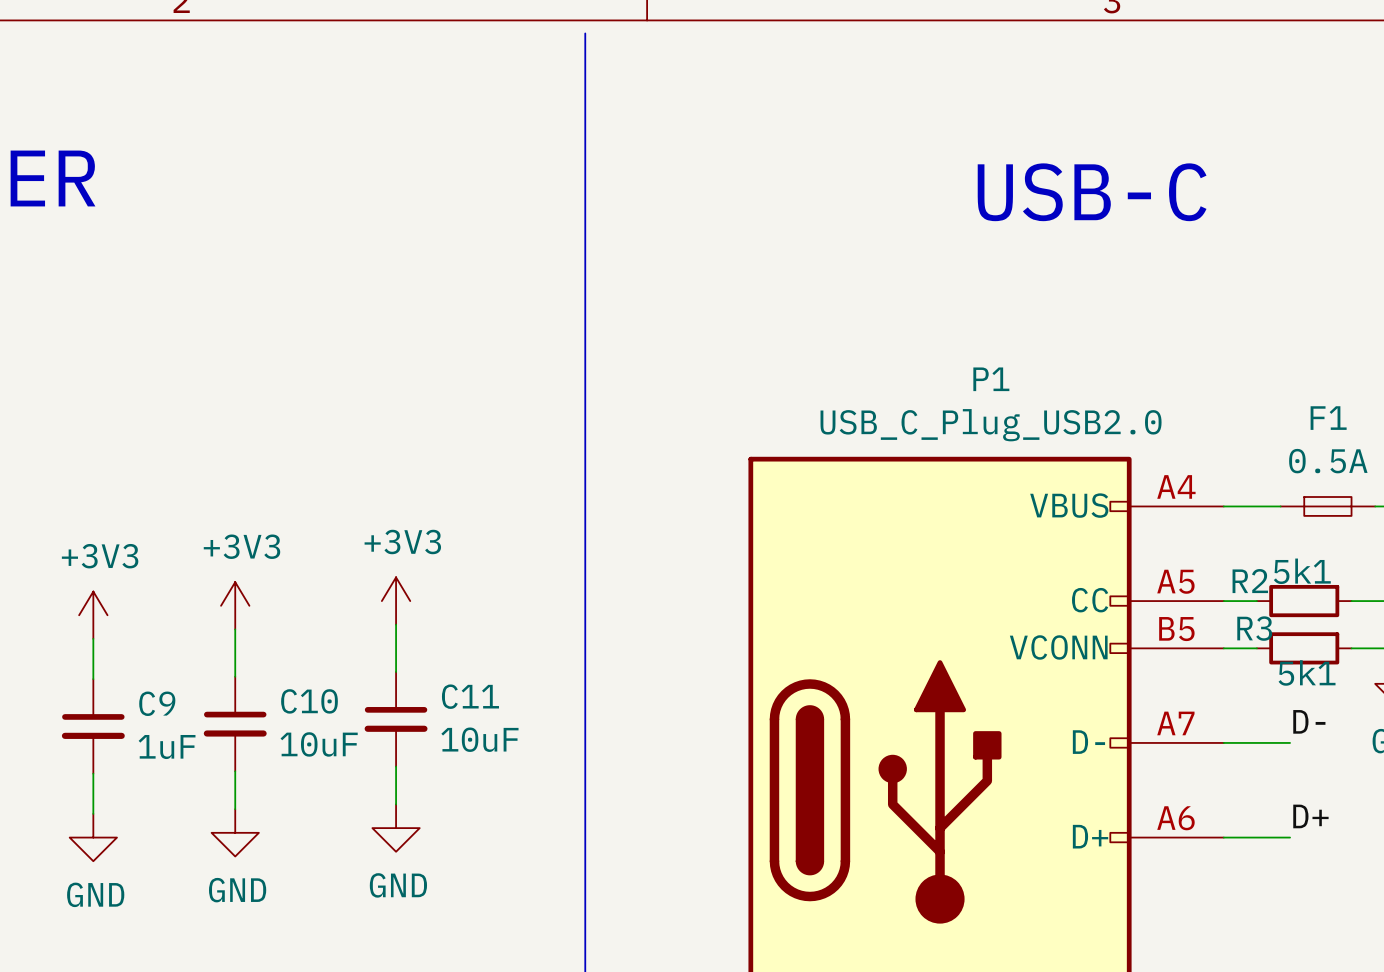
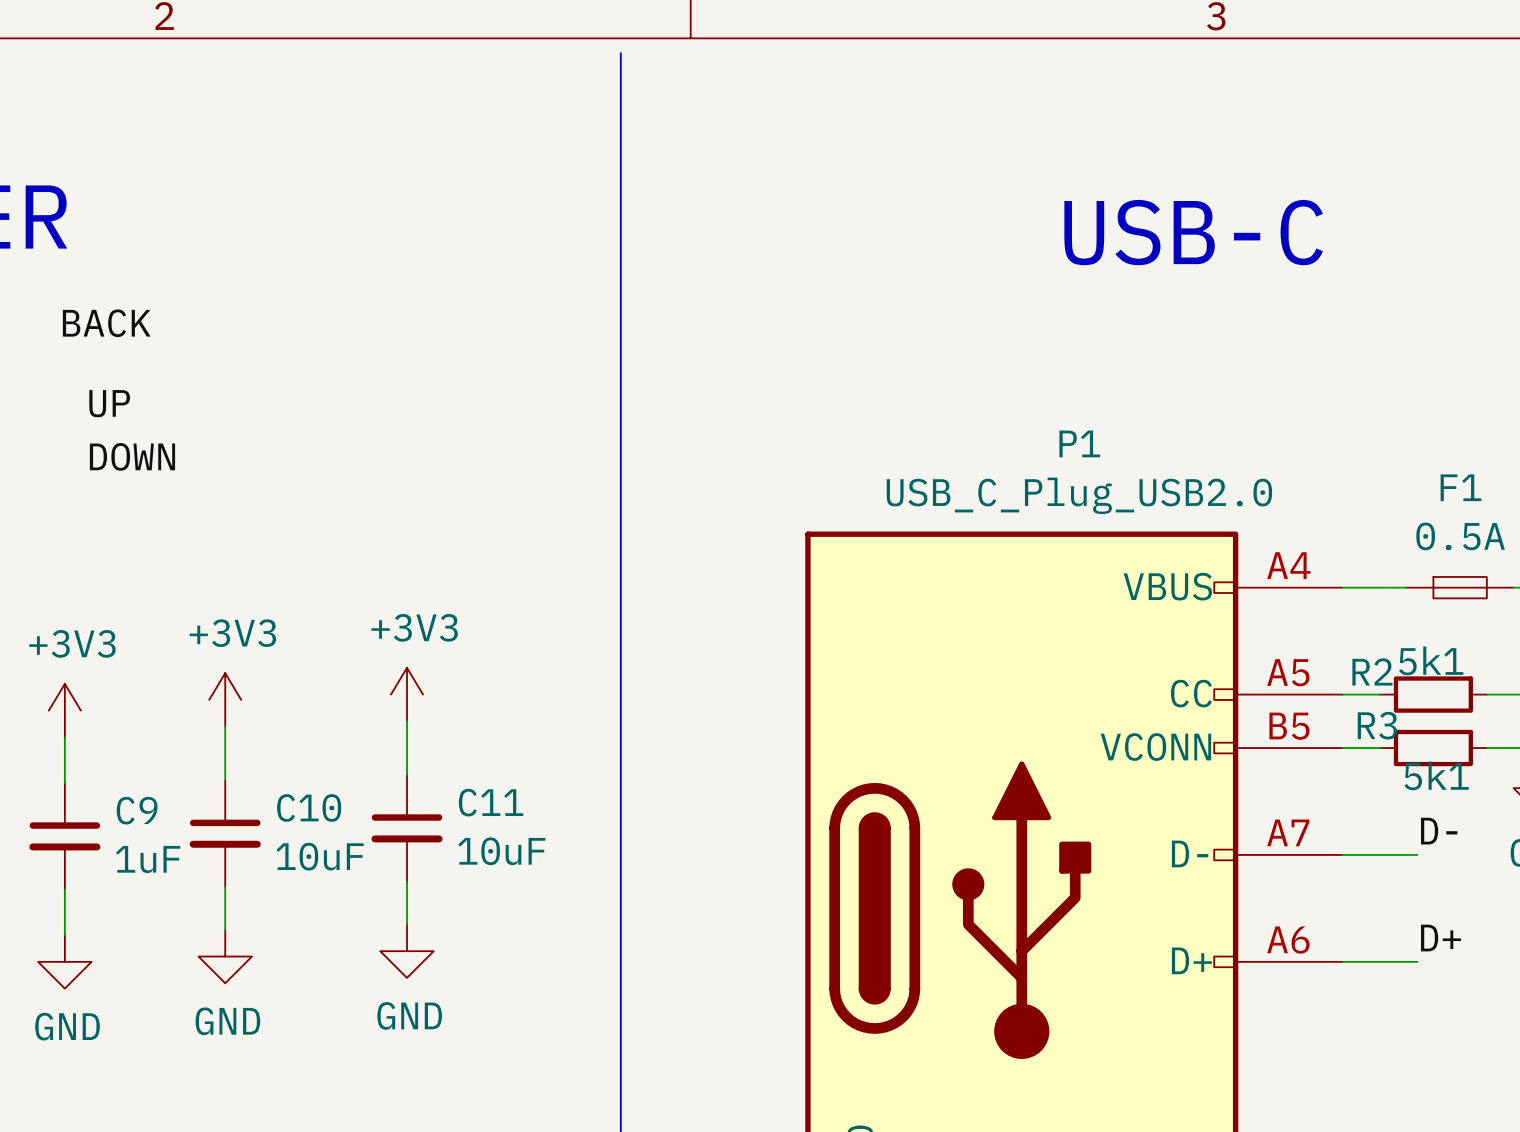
label: none -> BACK (106, 323)
label: none -> UP (109, 403)
label: none -> DOWN (132, 456)

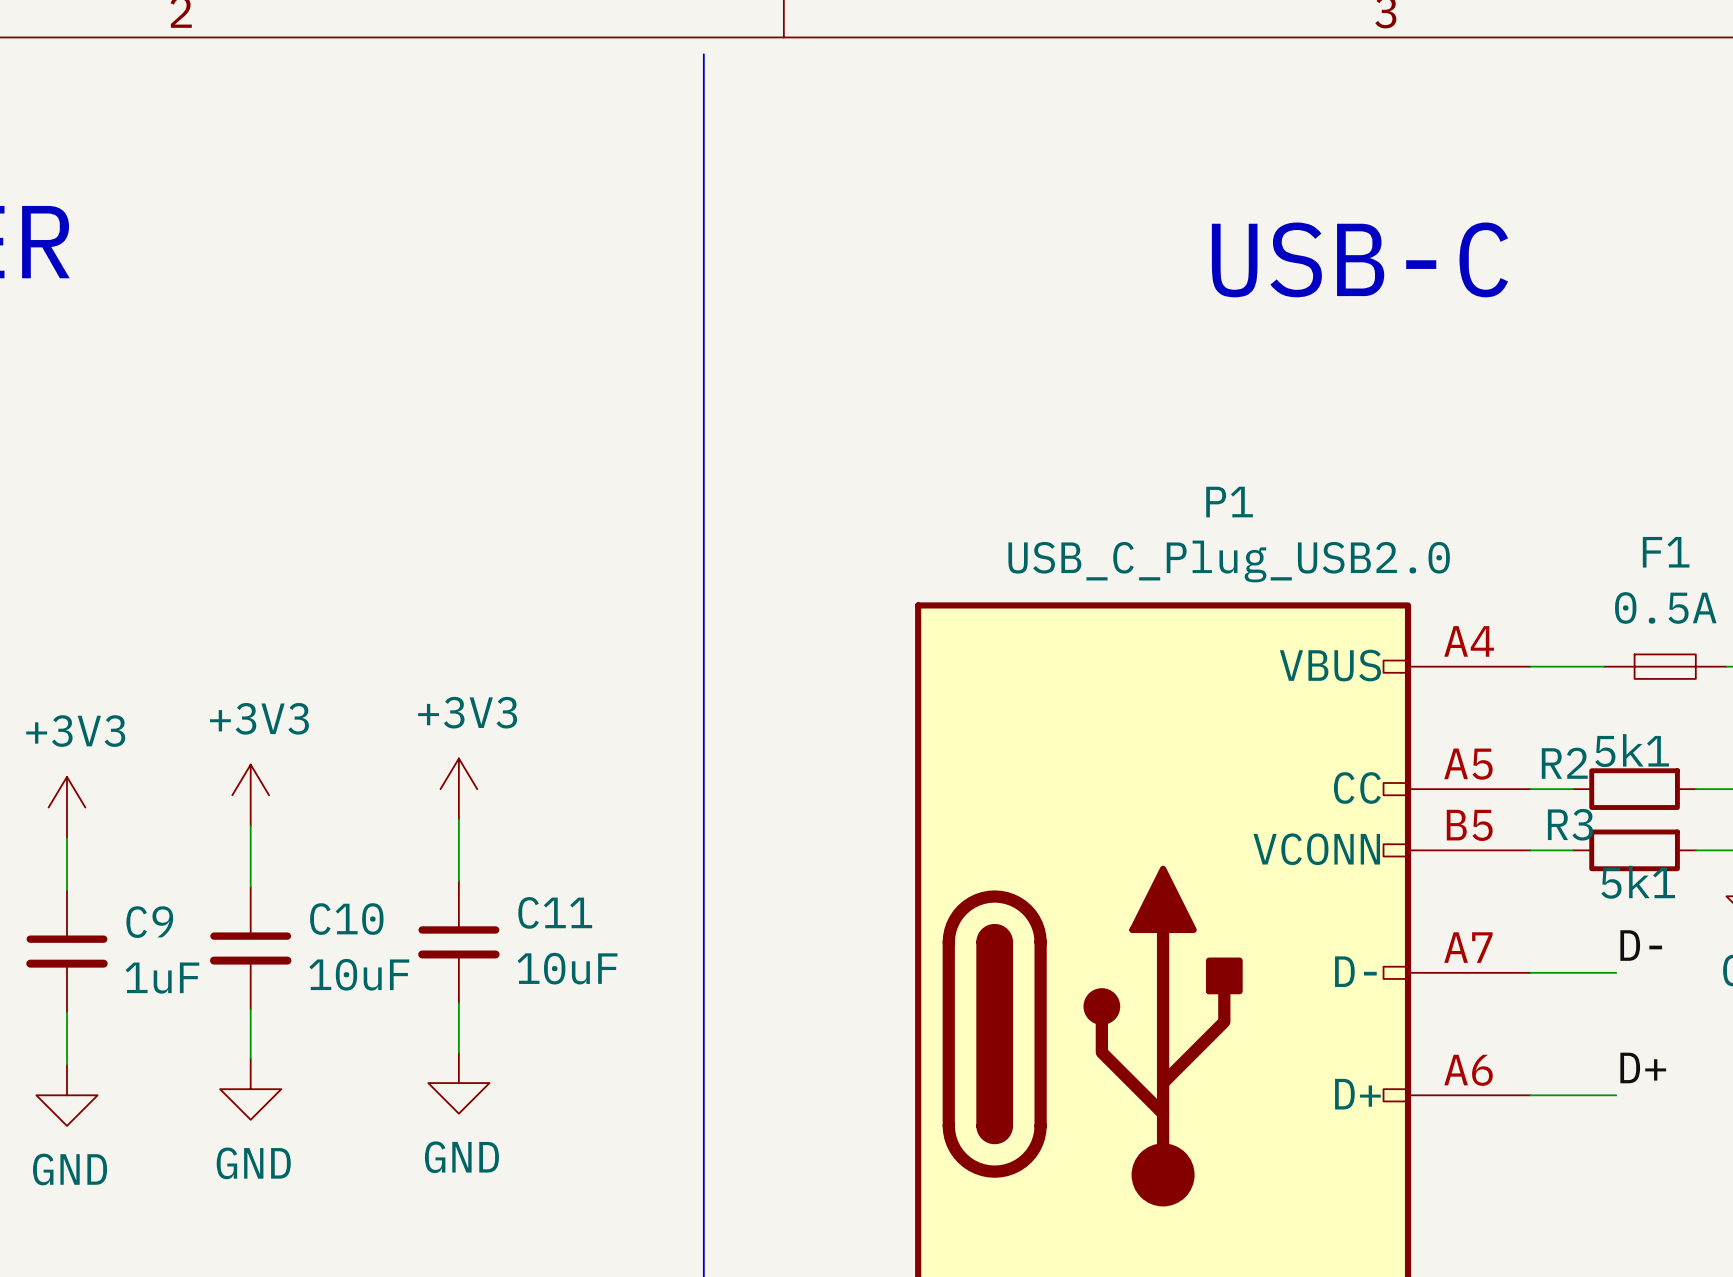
label: BACK (106, 323) -> none
label: UP (109, 403) -> none
label: DOWN (132, 456) -> none

